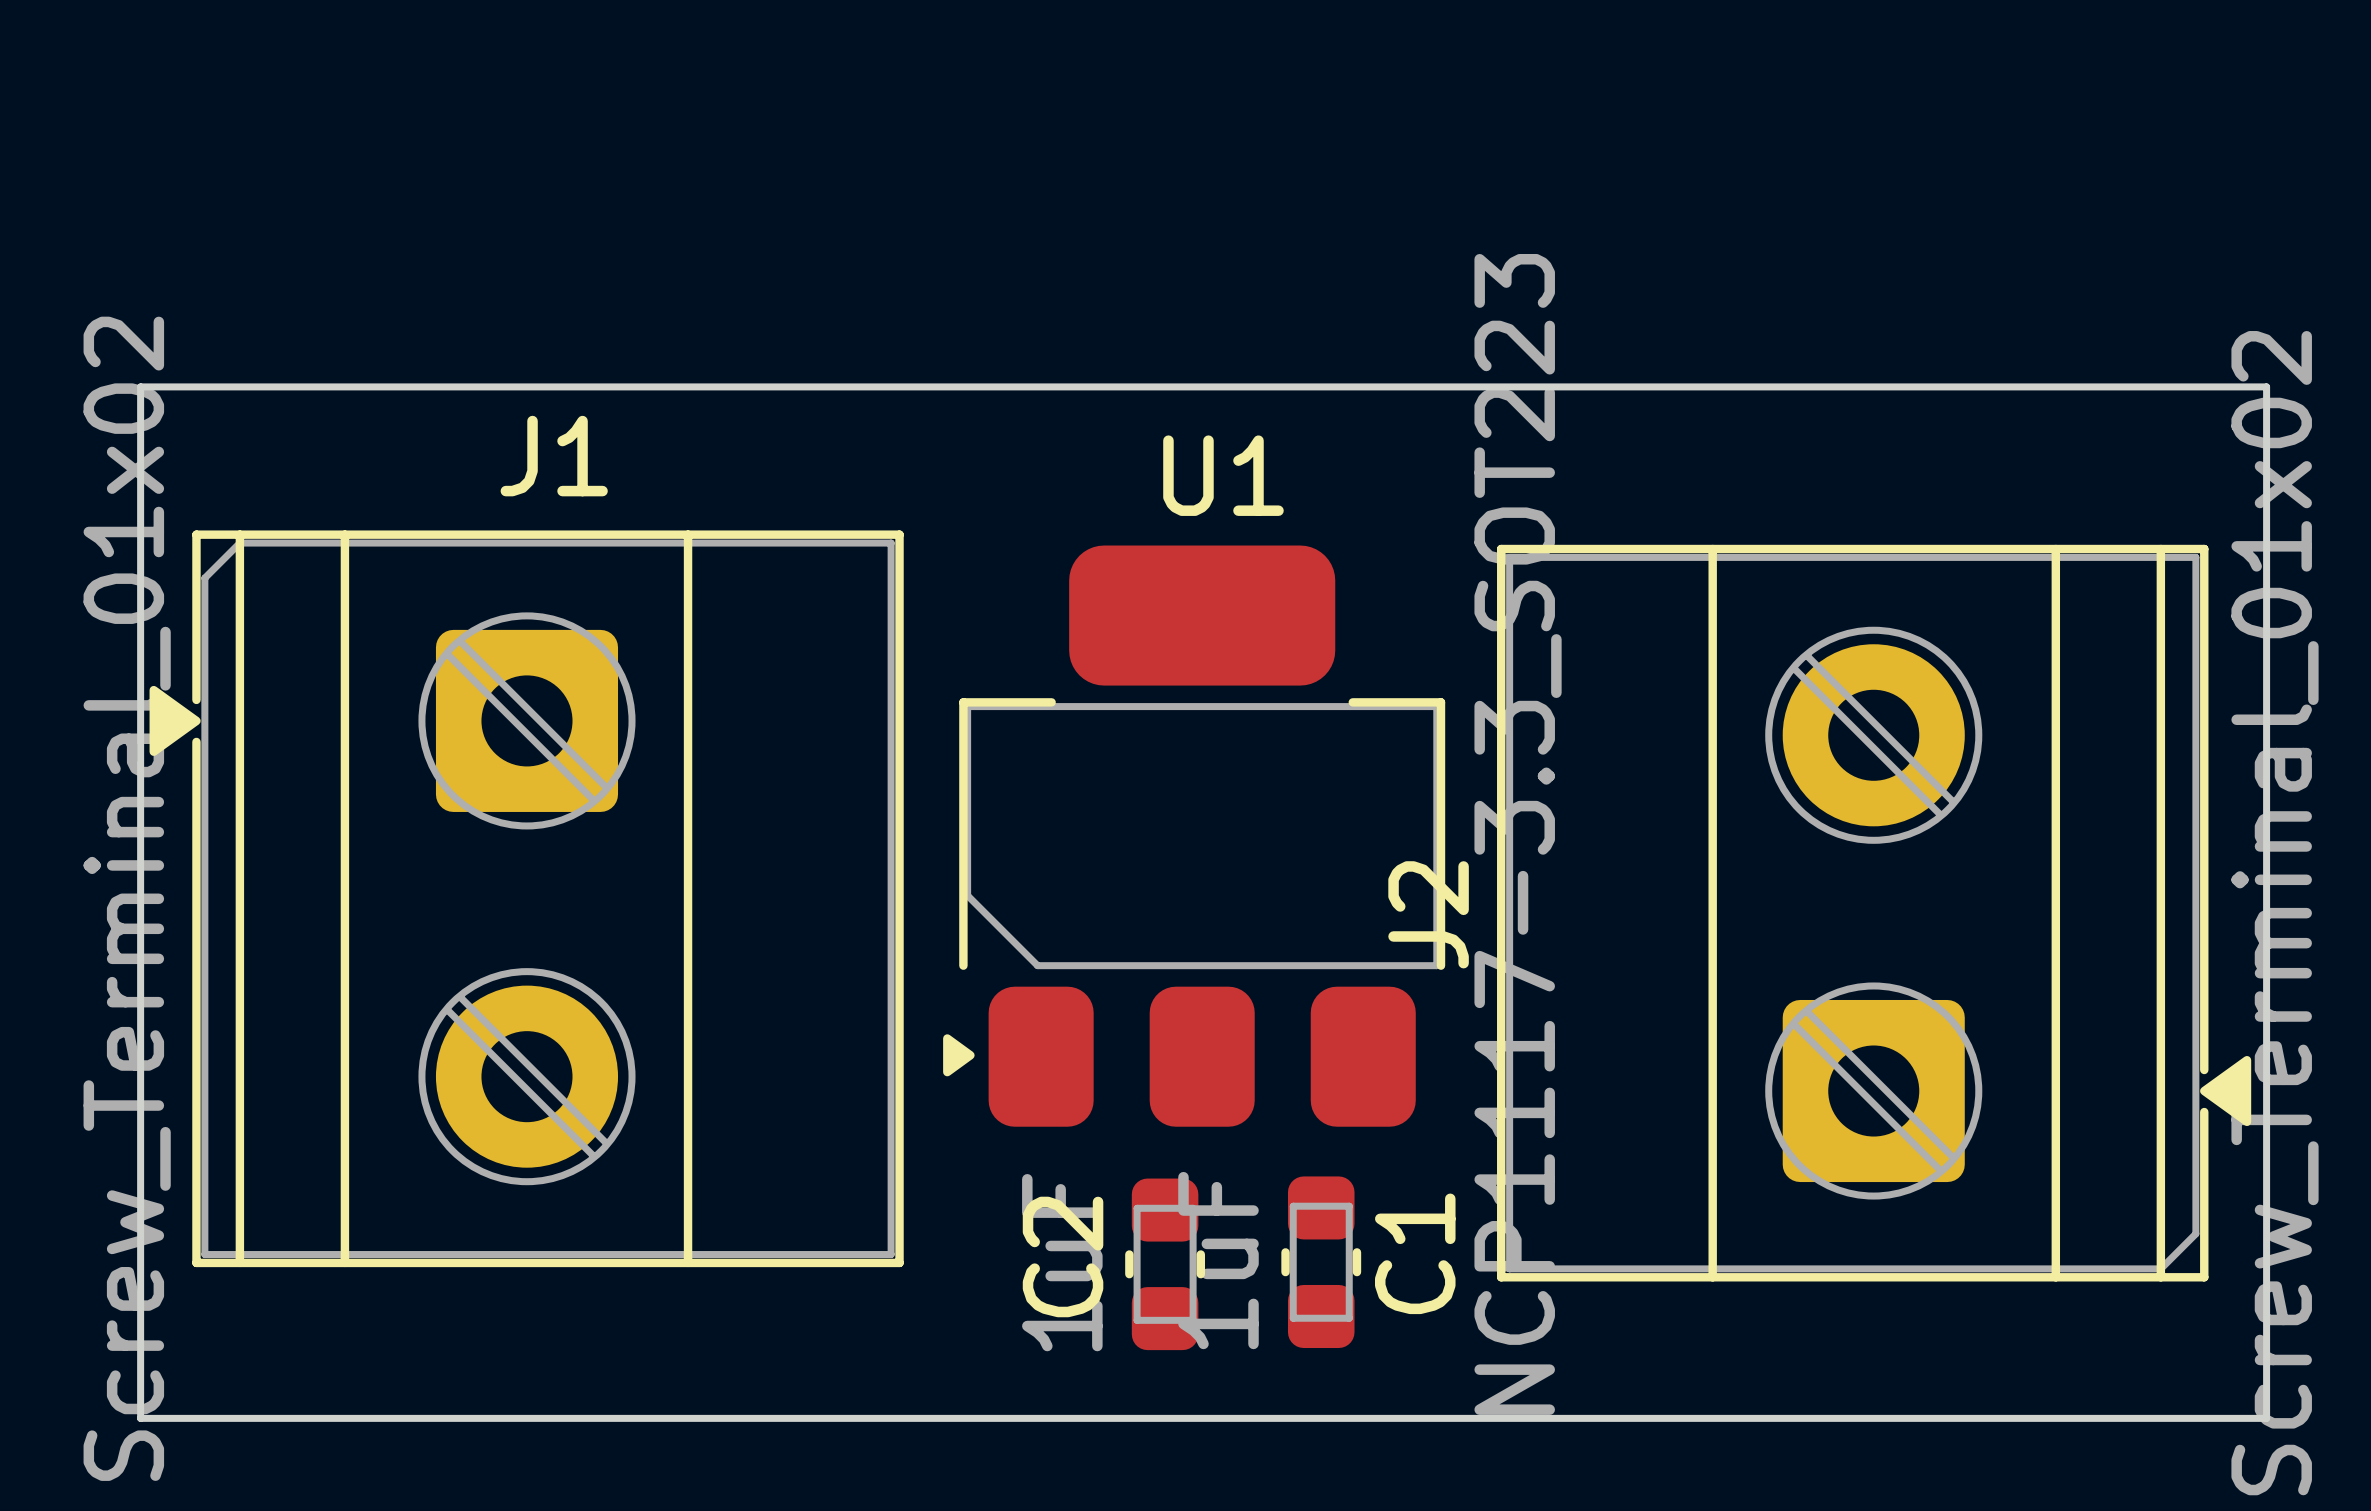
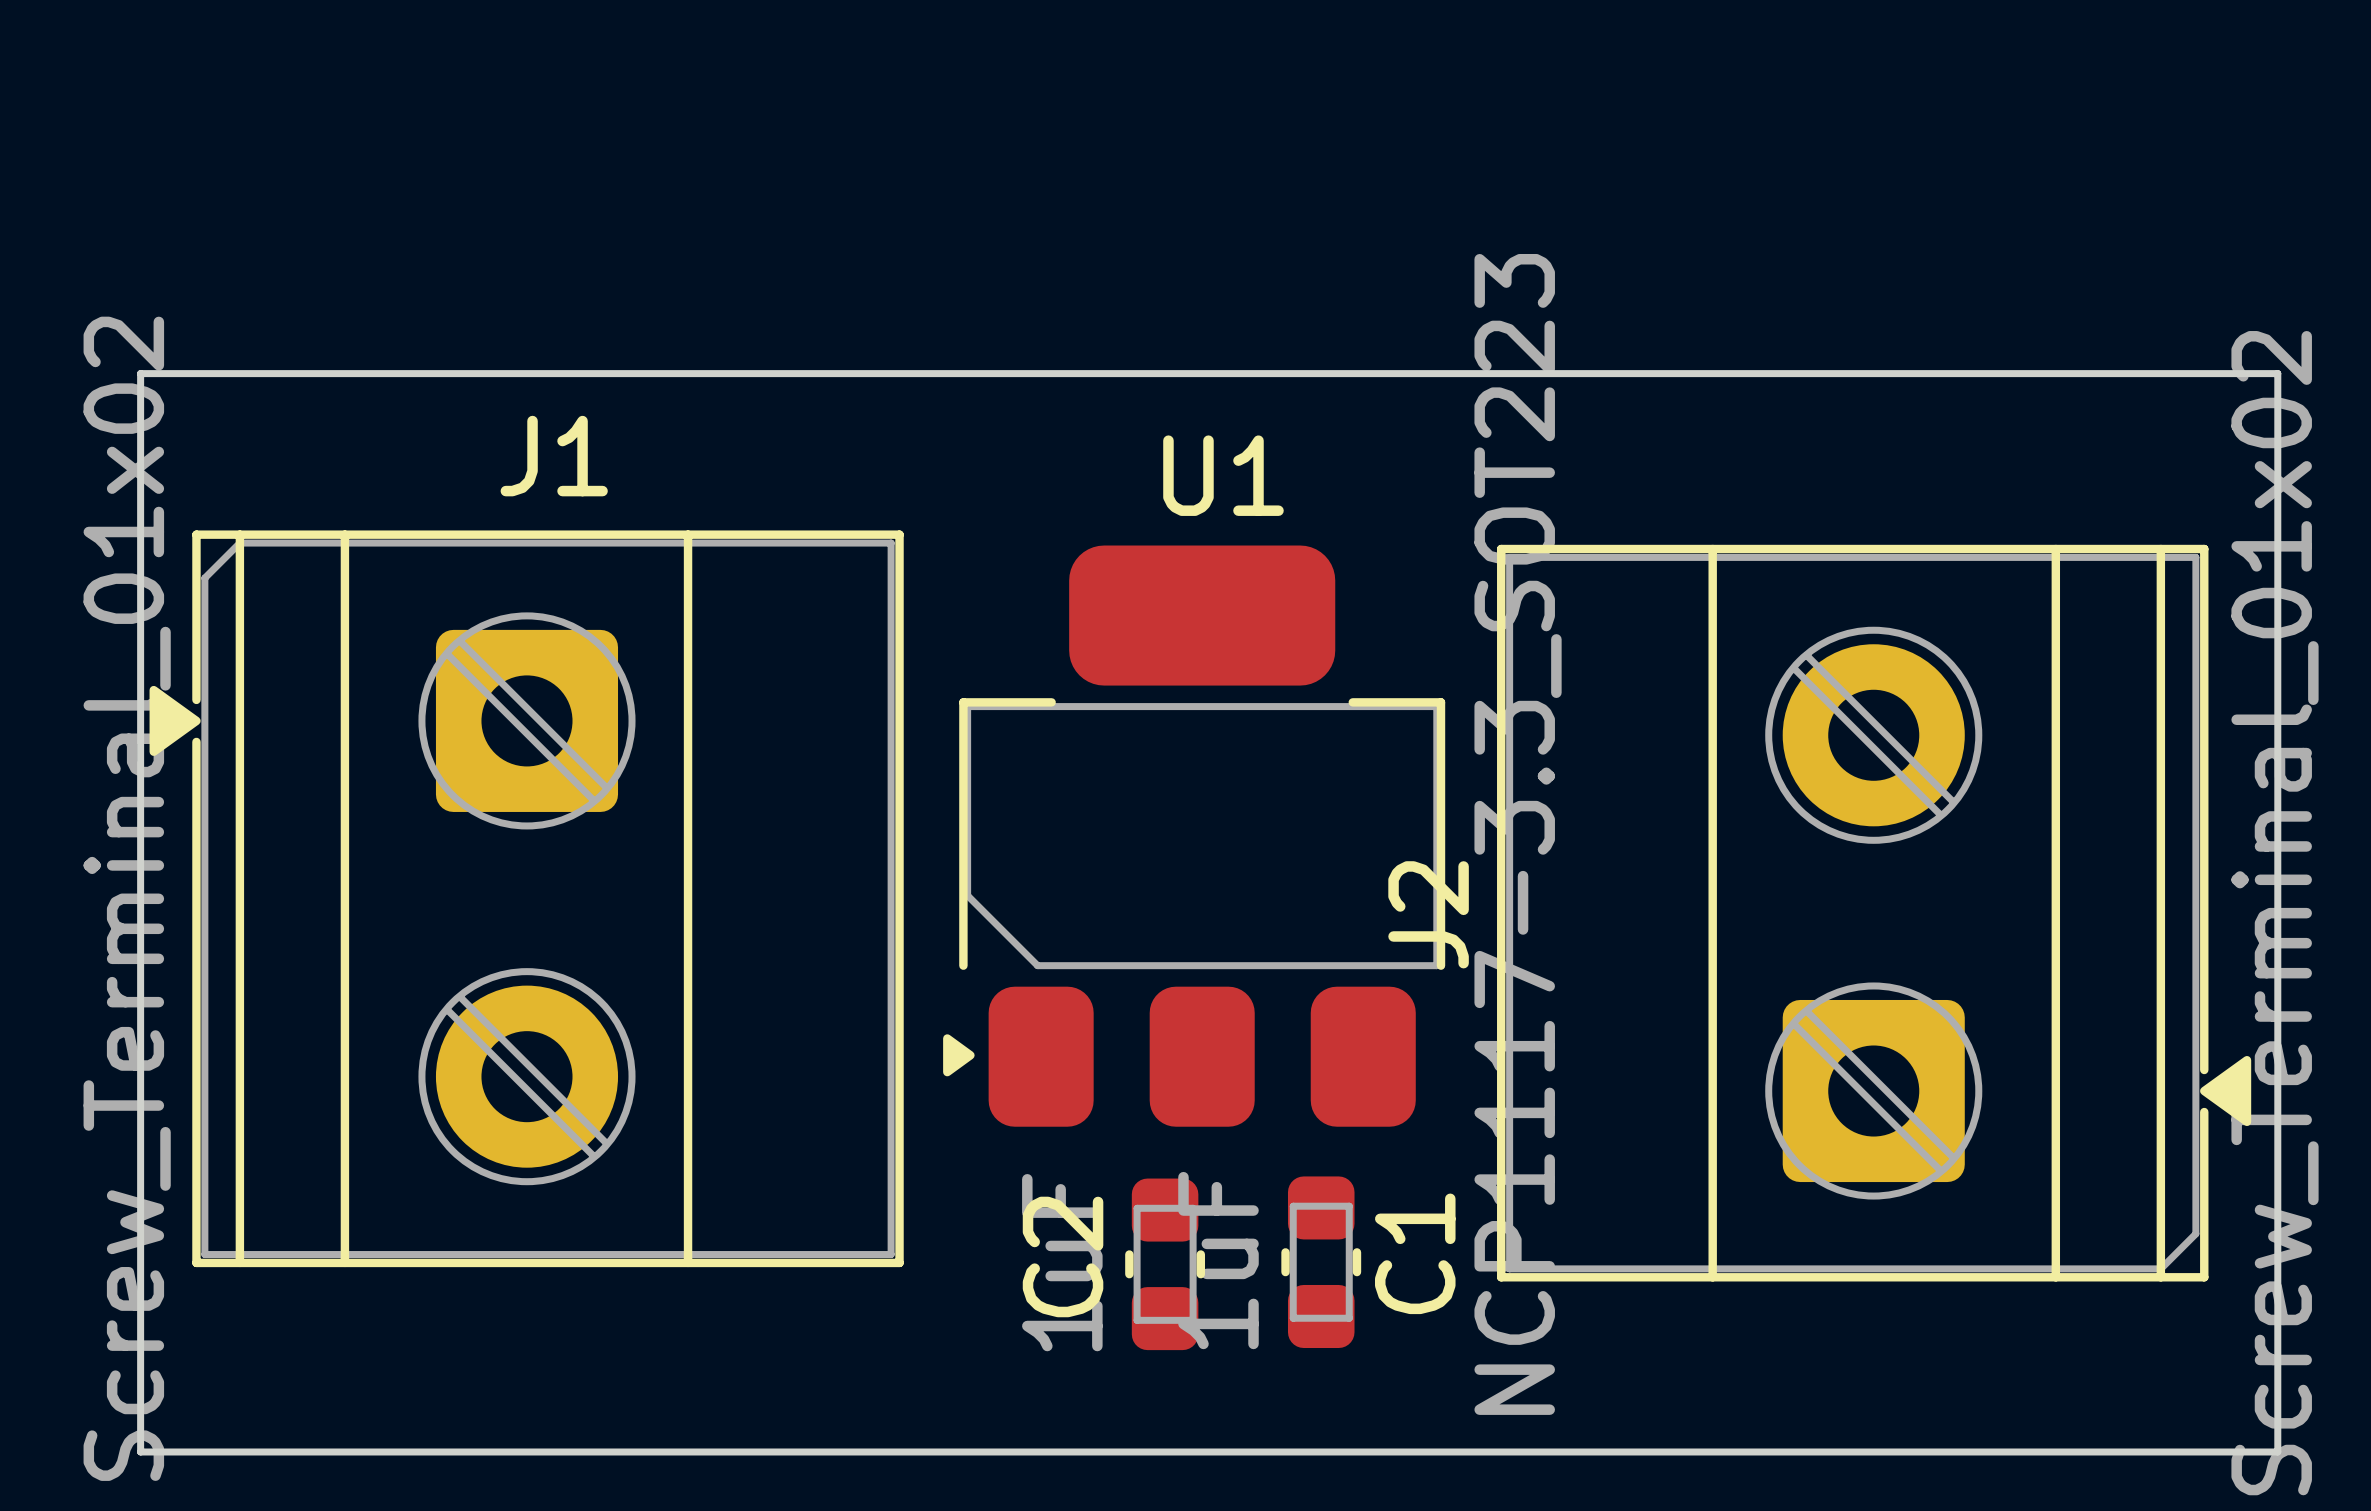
board edge: (140, 386) (2266, 386) (2266, 1418) (140, 1418) -> (140, 386) (140, 373) (2277, 373) (2277, 1451) (140, 1451) (140, 1418)

